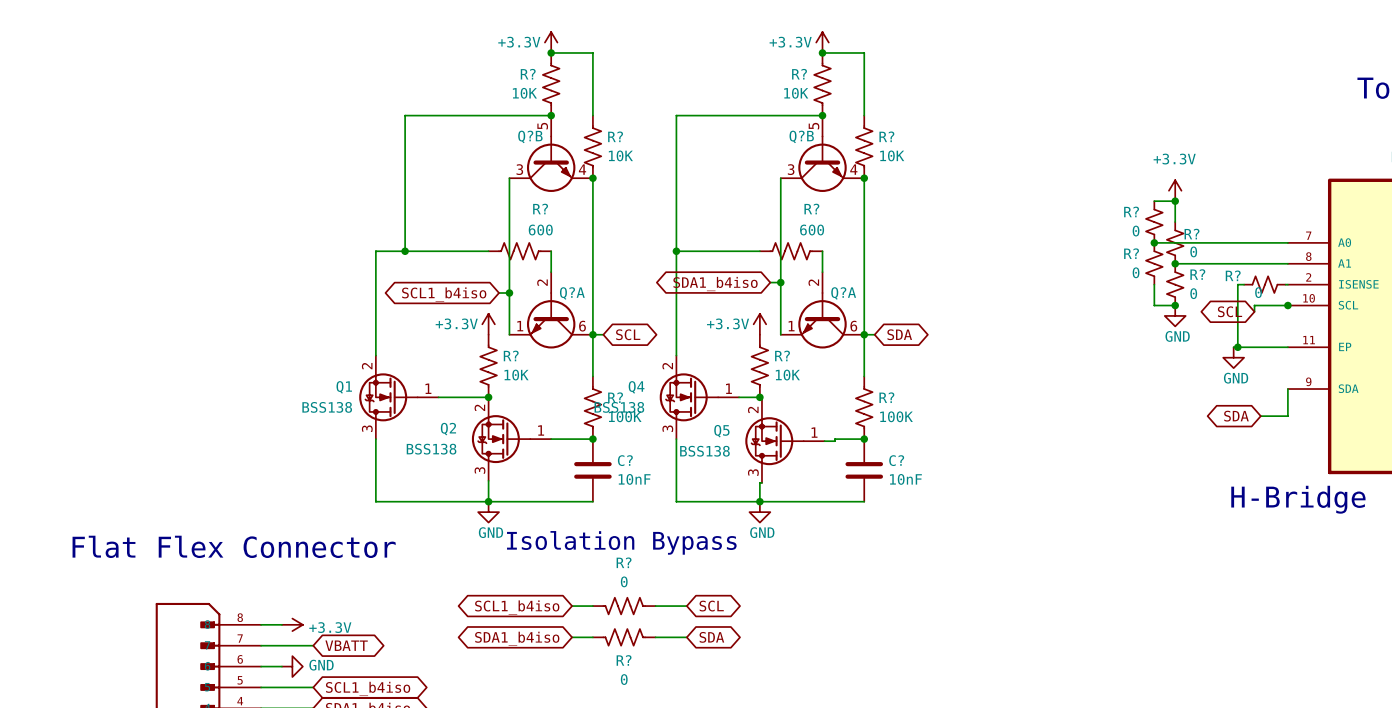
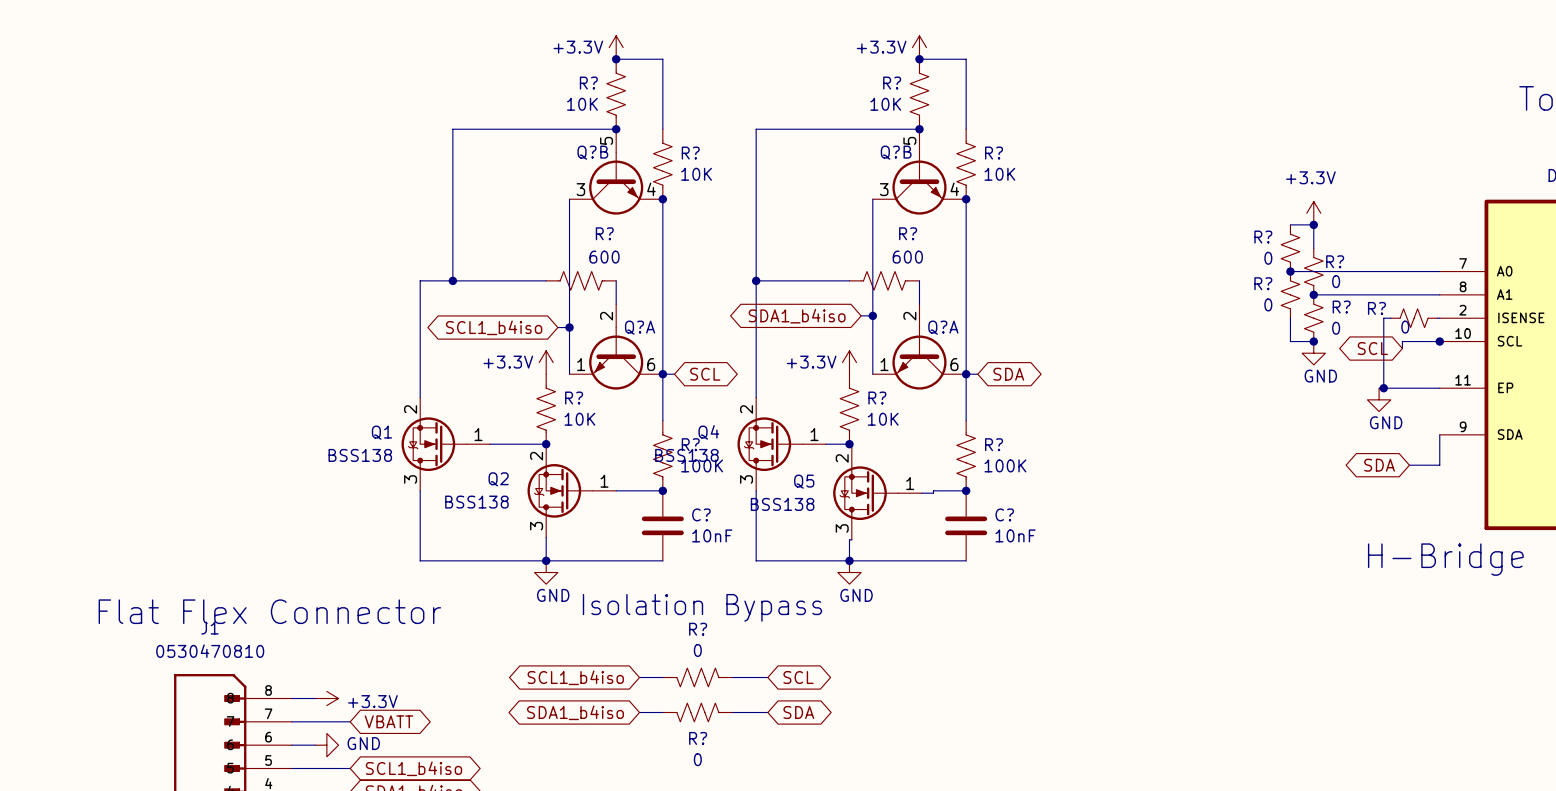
J1 name: none -> J1 (209, 628)
J1 value: none -> 0530470810 (210, 651)

